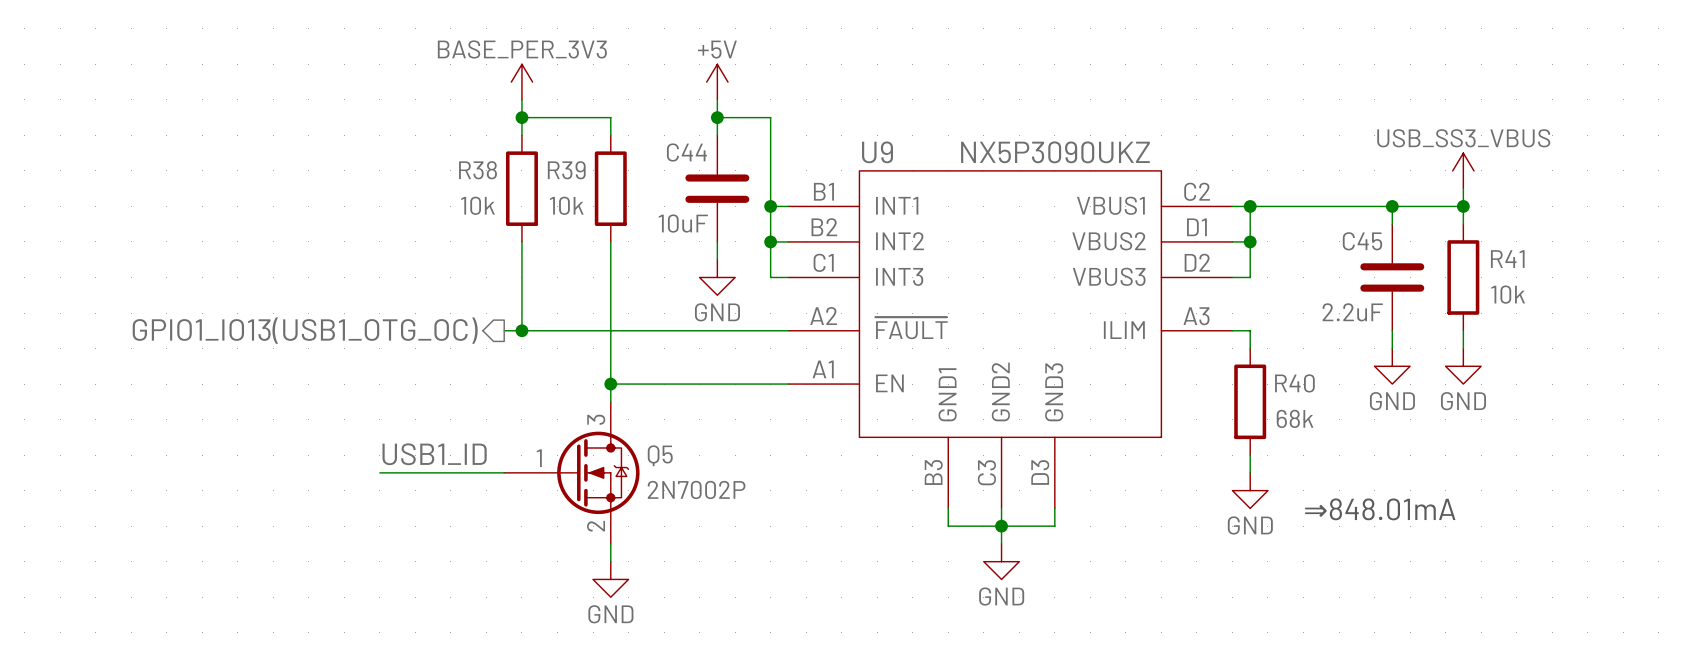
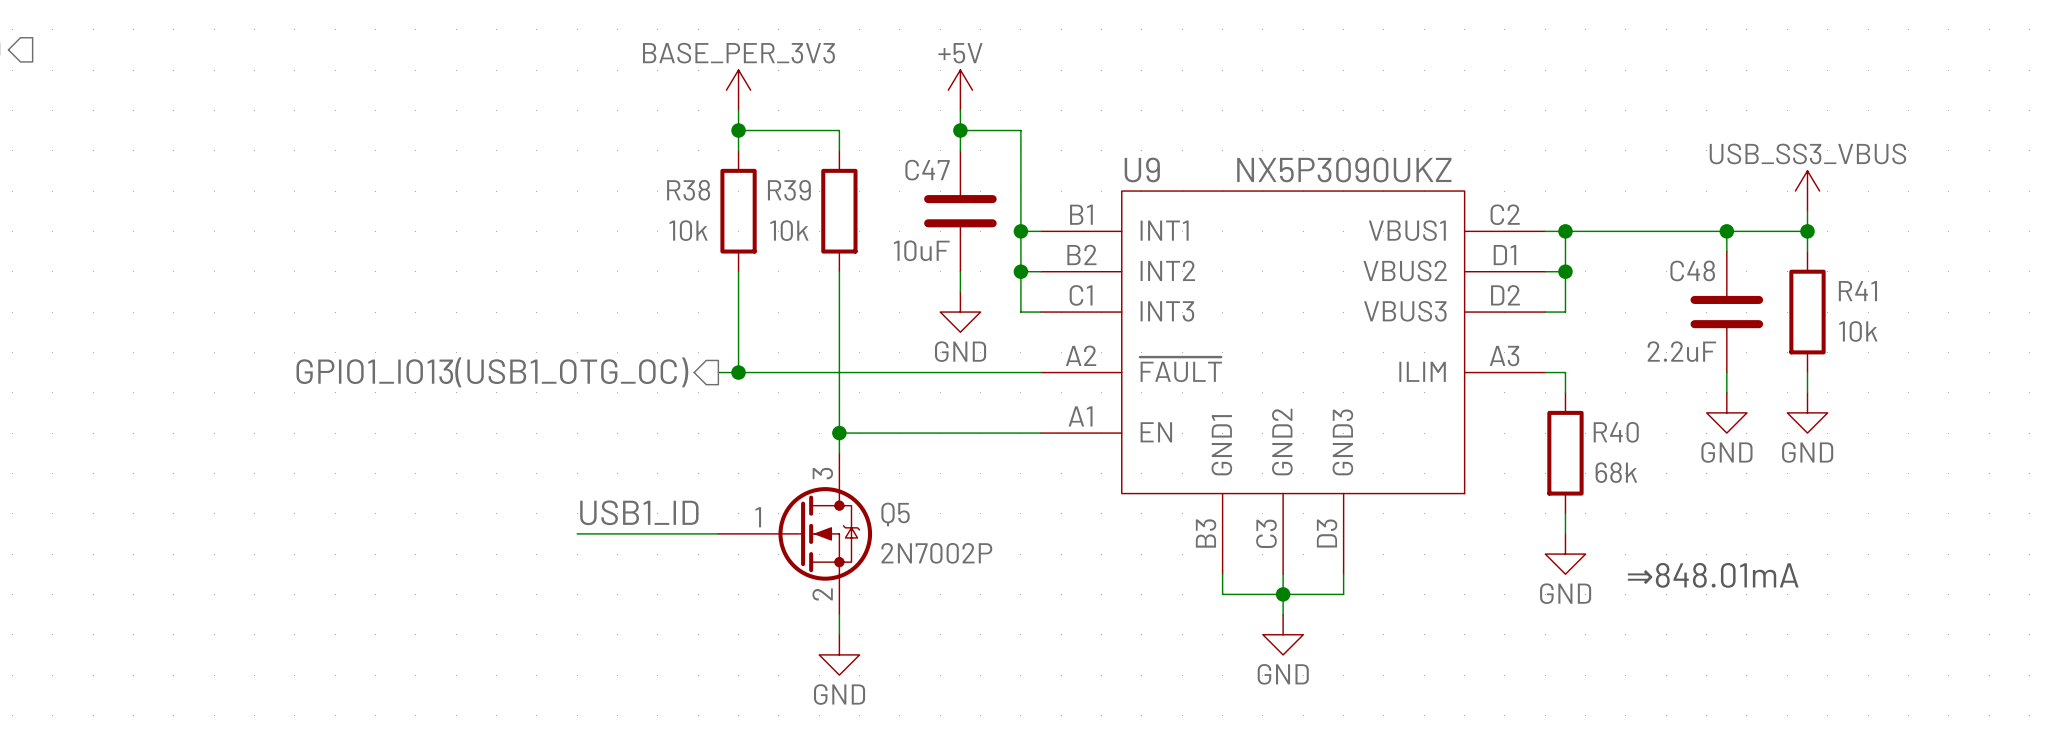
C44 name: C44 (686, 152) -> C47 (927, 170)
C45 name: C45 (1362, 241) -> C48 (1692, 270)

